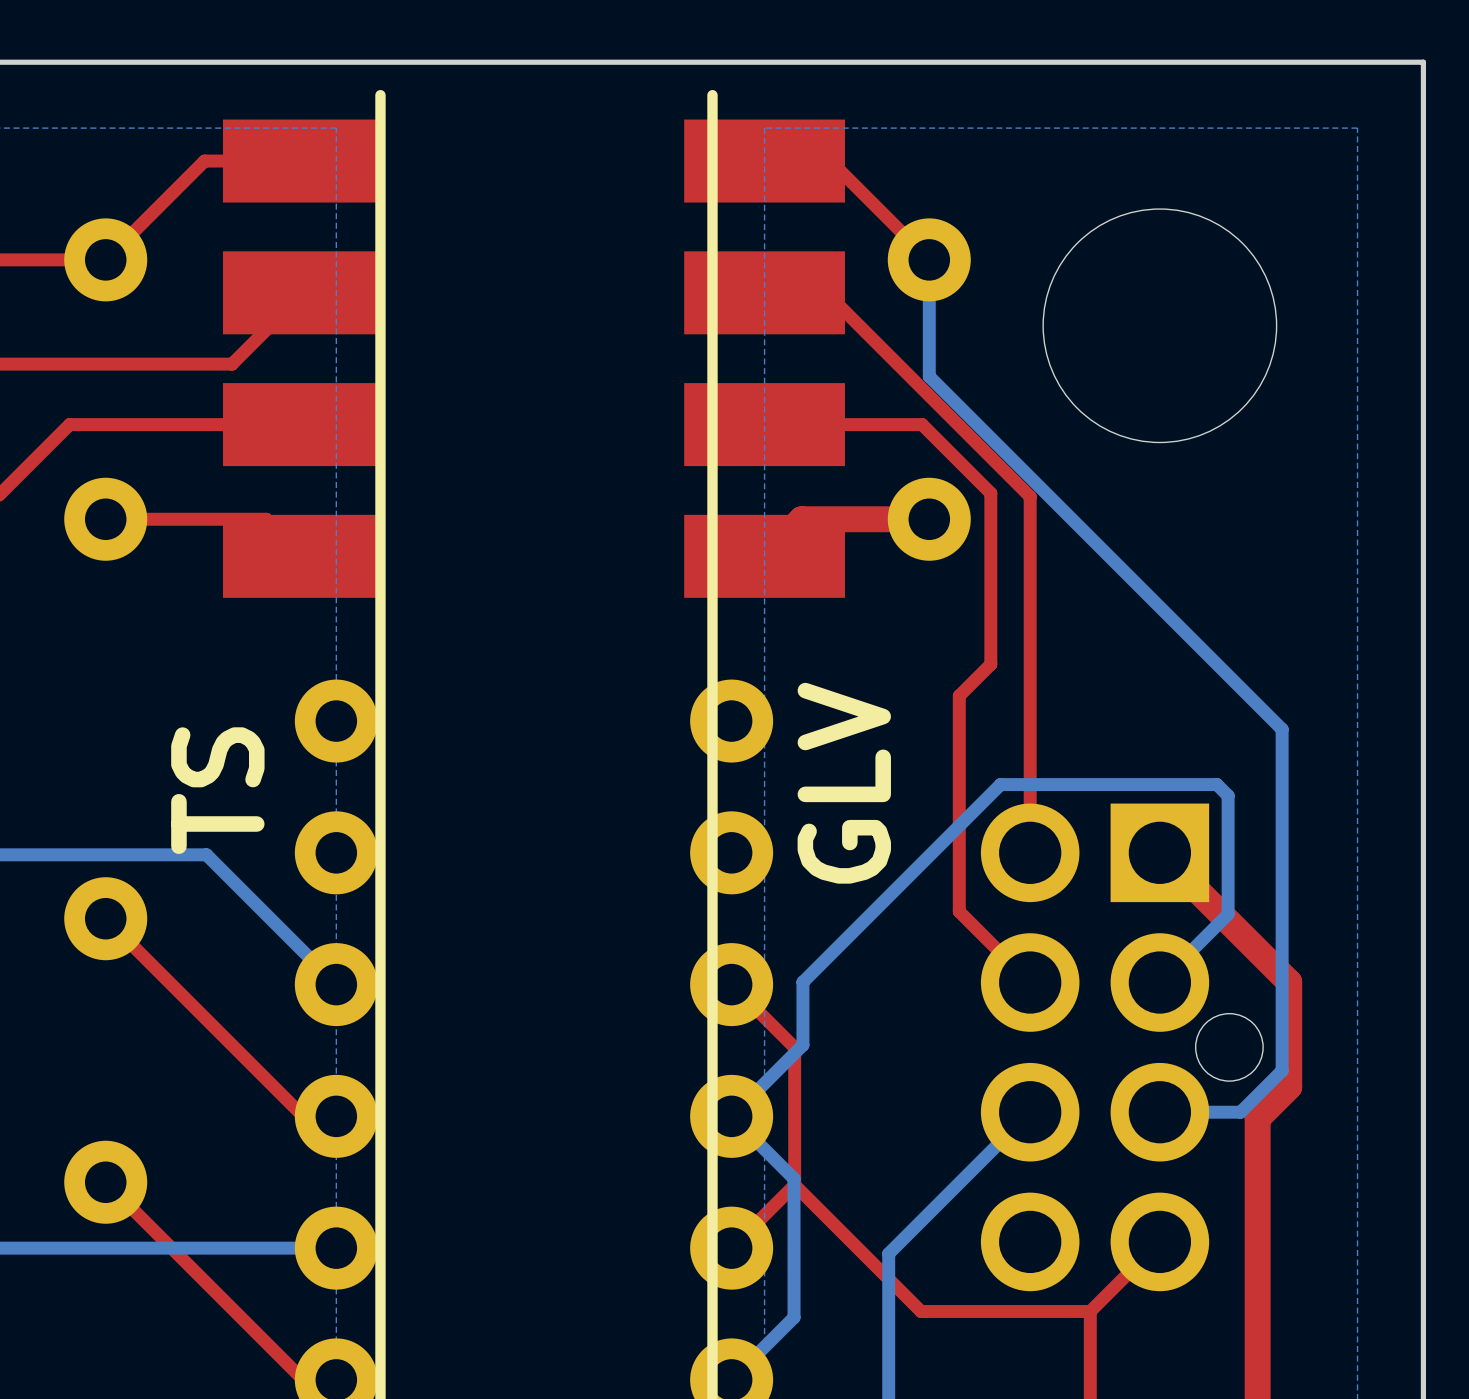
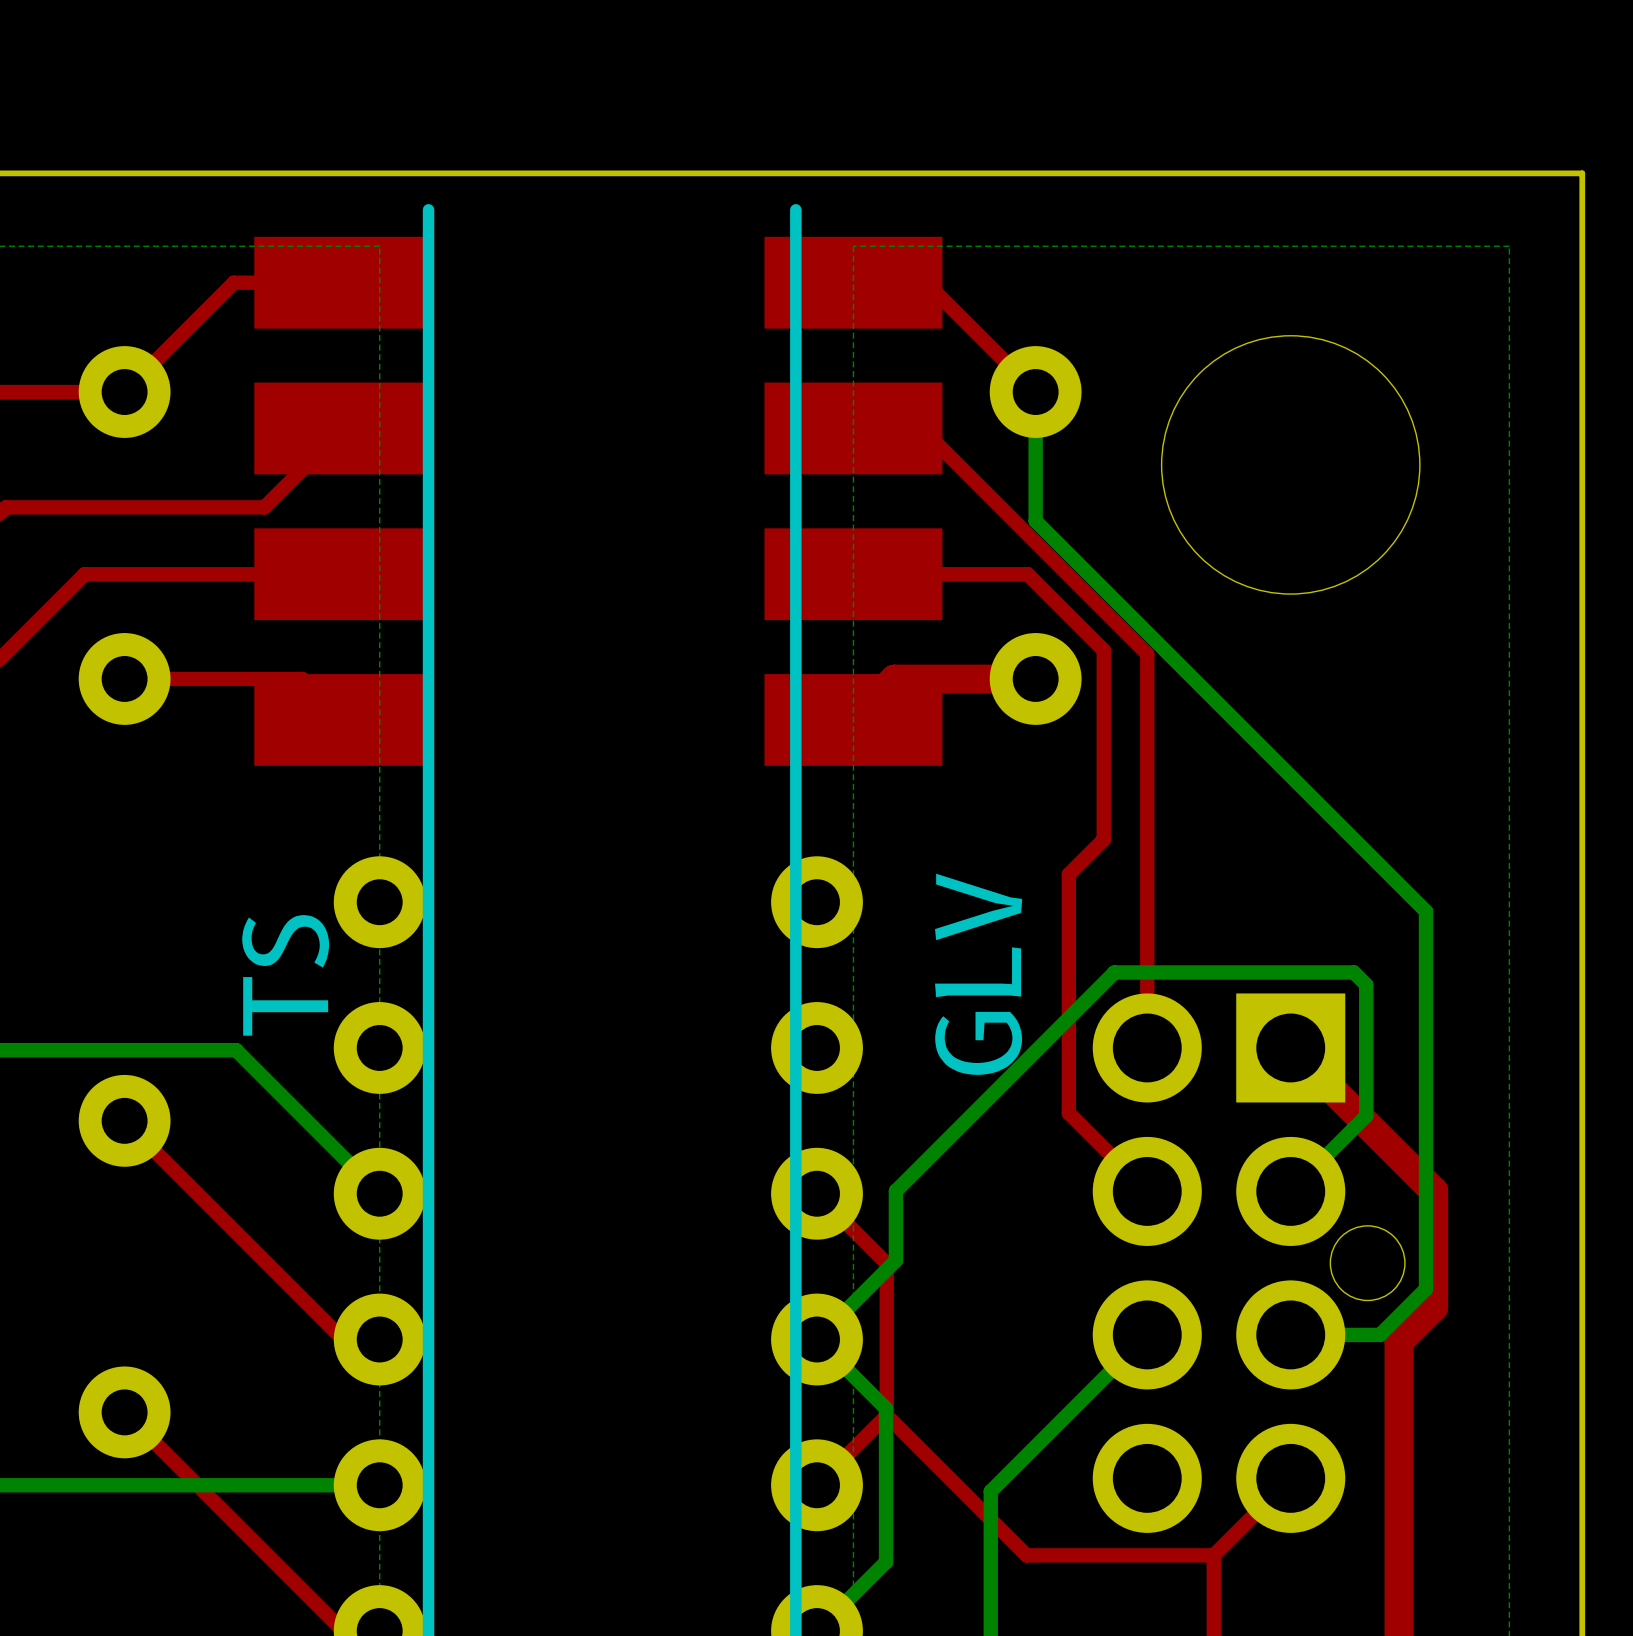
text position: GLV (844, 783) -> GLV (978, 974)
text position: TS (217, 790) -> TS (285, 975)

